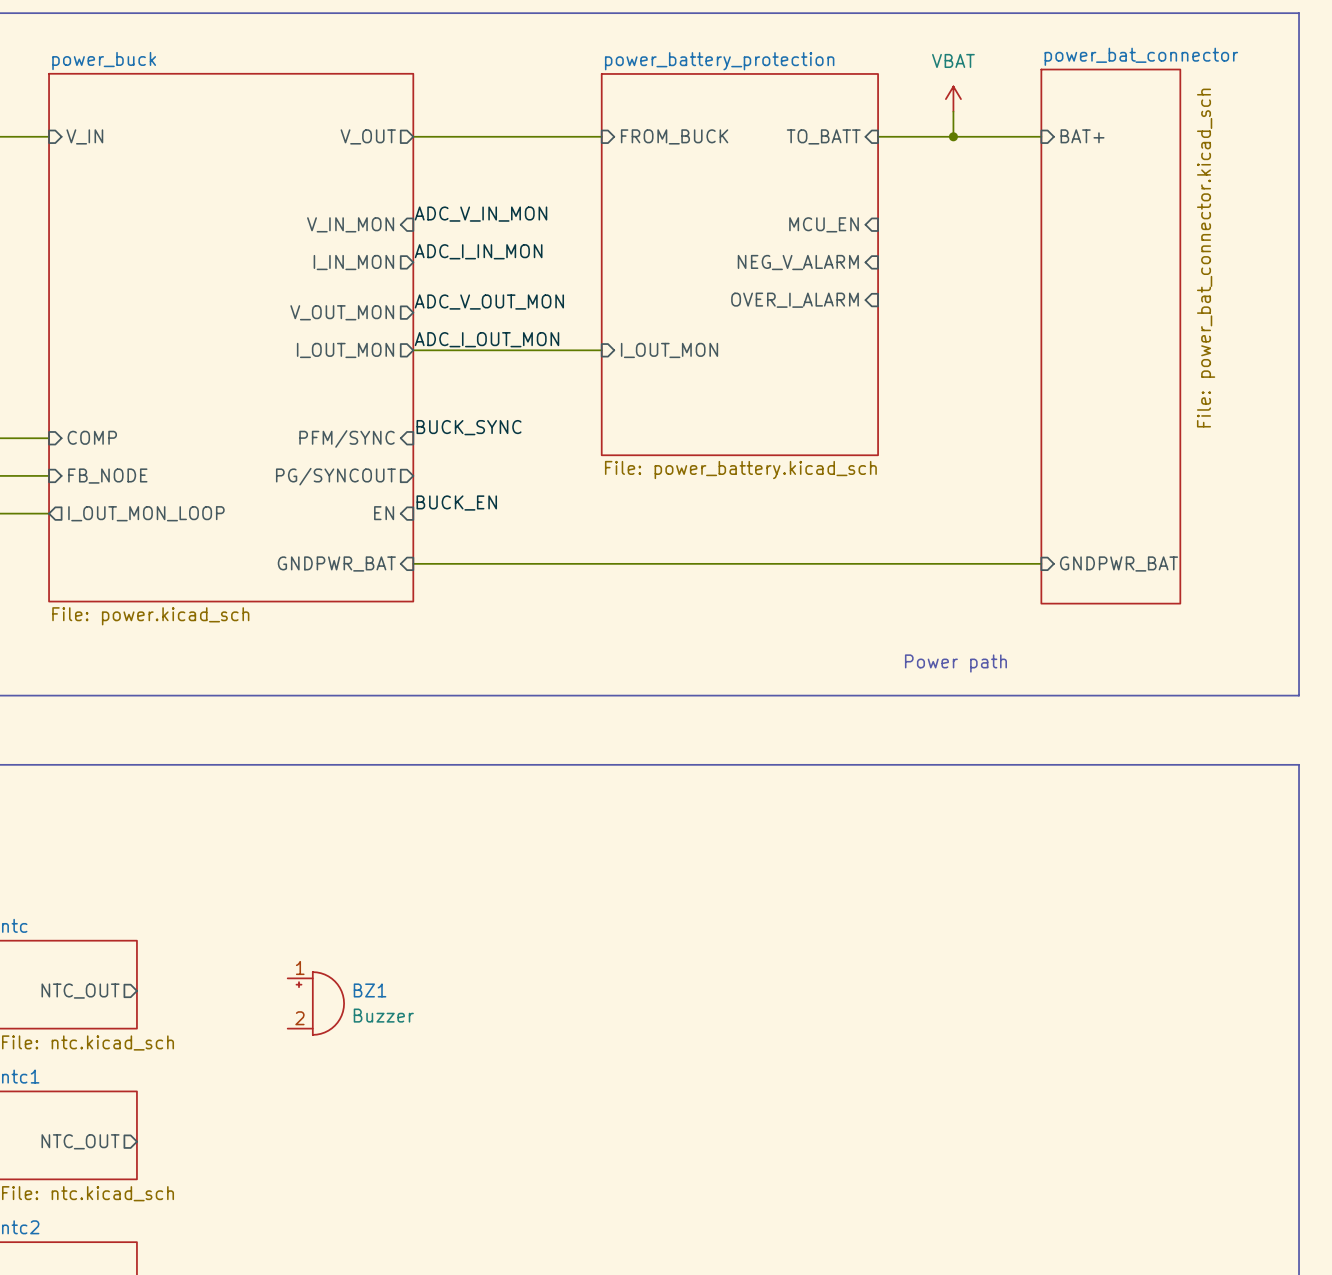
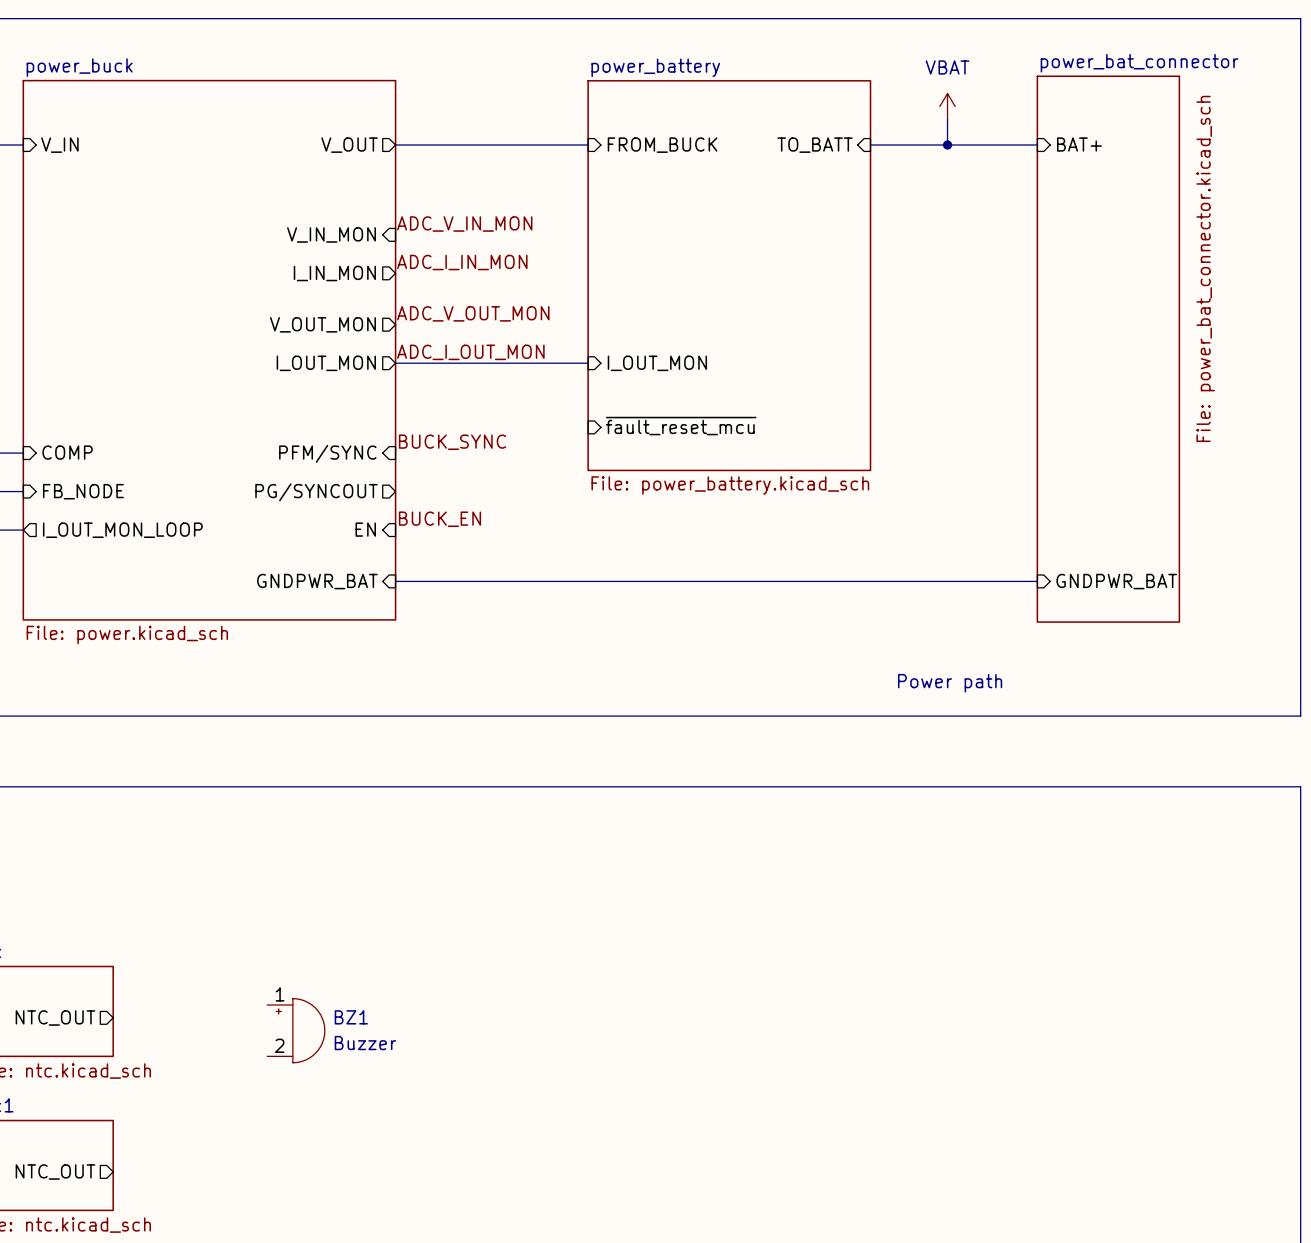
sheet power_battery_protection name: power_battery_protection (719, 61) -> power_battery (655, 67)
sheet pin: MCU_EN (824, 224) -> none
sheet pin: NEG_V_ALARM (798, 262) -> none
sheet pin: OVER_I_ALARM (795, 300) -> none
sheet pin: none -> ~{fault_reset_mcu} (681, 426)

